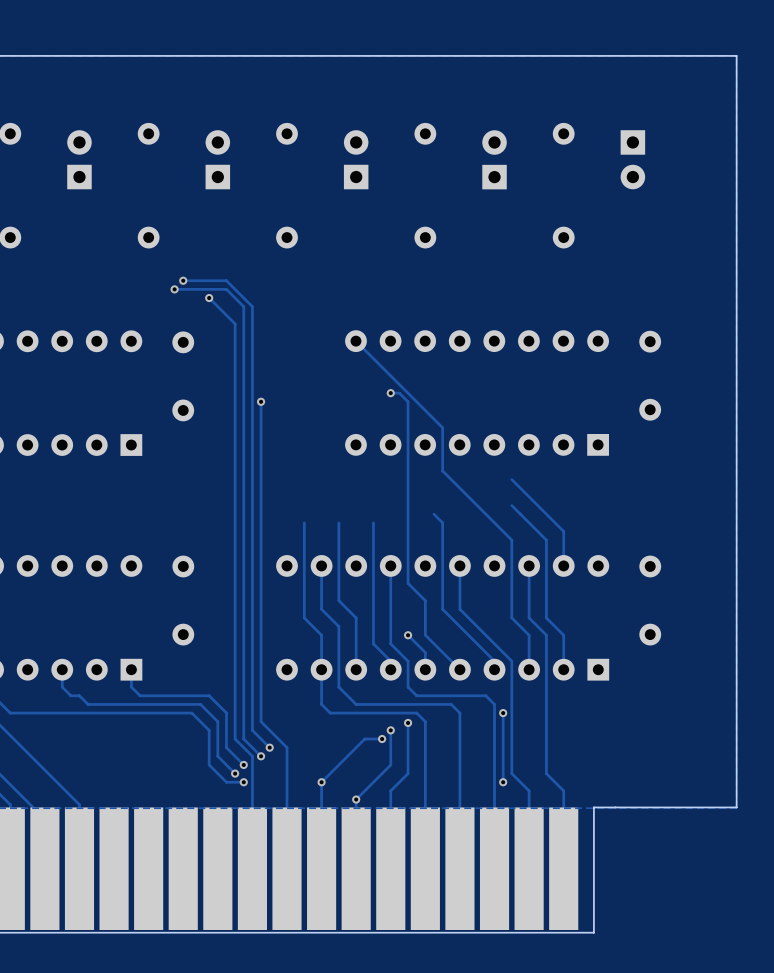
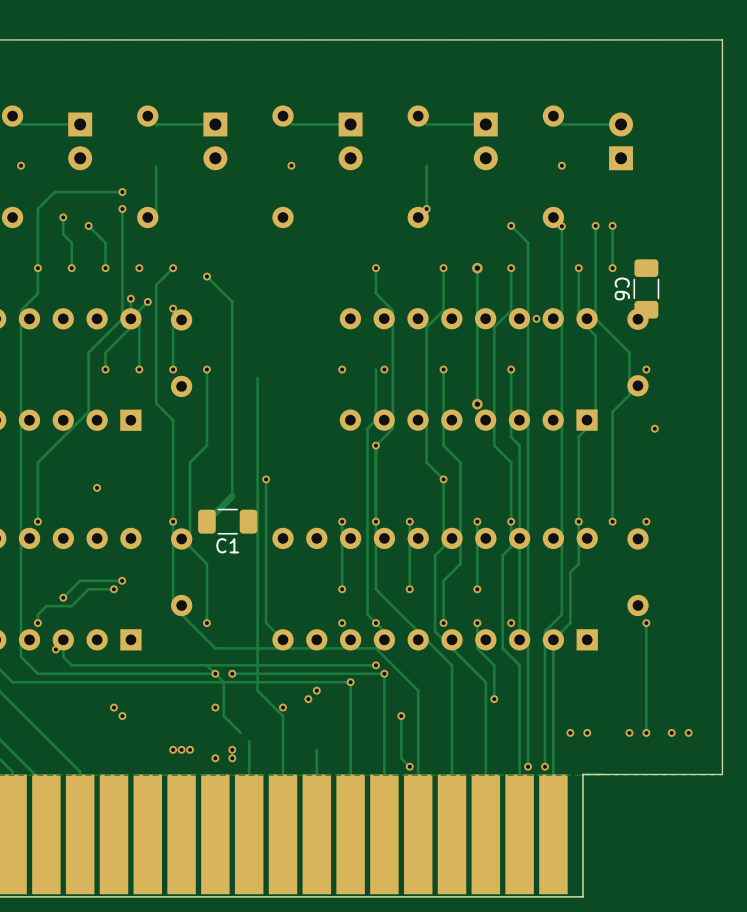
track: none -> (80, 124) (21, 124)
track: none -> (215, 124) (156, 125)
track: none -> (350, 124) (291, 124)
track: none -> (485, 124) (426, 124)
track: none -> (621, 124) (561, 124)
part rotation: 0° (79, 159) -> 180° (80, 141)
part rotation: 0° (217, 159) -> 180° (215, 141)
part rotation: 0° (356, 159) -> 180° (350, 141)
part rotation: 0° (494, 159) -> 180° (485, 141)
part rotation: 0° (632, 159) -> 180° (621, 141)
via: none -> (21, 165)
via: none -> (291, 165)
track: none -> (426, 165) (426, 208)
via: none -> (561, 165)
track: none -> (156, 166) (156, 217)
track: none -> (122, 192) (54, 192) (37, 208) (37, 293) (21, 310) (21, 656) (37, 673) (88, 673)
via: none -> (122, 192)
track: none -> (122, 208) (122, 318) (88, 352) (88, 411) (37, 462) (37, 521)
via: none -> (122, 208)
via: none -> (426, 208)
track: none -> (63, 217) (63, 234) (71, 242) (71, 268)
via: none -> (63, 217)
track: none -> (88, 225) (105, 242) (105, 268)
via: none -> (88, 225)
track: none -> (511, 225) (528, 242) (528, 766)
via: none -> (511, 225)
track: none -> (561, 226) (561, 614) (544, 631) (544, 766)
via: none -> (561, 226)
track: none -> (595, 225) (595, 318) (629, 352) (629, 394) (612, 411) (612, 521)
via: none -> (595, 225)
track: none -> (612, 225) (612, 268)
via: none -> (612, 225)
track: (183, 280) (226, 280) (252, 306) (252, 730) (269, 747) -> none
via: (183, 280) -> none
via: none -> (37, 268)
via: none -> (71, 268)
via: none -> (105, 268)
via: none -> (139, 268)
track: (174, 289) (226, 289) (243, 306) (243, 739) (261, 756) -> (173, 268) (156, 285) (156, 403) (173, 420) (173, 606) (215, 648) (375, 648) (409, 682)
track: none -> (375, 268) (375, 293) (392, 310) (392, 428) (375, 445) (375, 589) (452, 665) (452, 682)
via: none -> (375, 268)
via: none -> (443, 268)
track: none -> (477, 268) (477, 404)
via: none -> (477, 268)
track: none -> (511, 268) (511, 310) (494, 327) (494, 445) (502, 454)
via: none -> (511, 268)
via: none -> (578, 268)
via: none -> (612, 268)
C6: none -> (646, 288)
track: none -> (130, 298) (130, 327) (105, 352) (105, 369)
via: none -> (130, 298)
track: none -> (147, 301) (139, 310) (139, 369)
via: none -> (147, 301)
track: none -> (173, 308) (173, 369)
via: none -> (173, 308)
track: (355, 341) (442, 427) (442, 470) (511, 540) (511, 583) -> none
via: none -> (536, 318)
via: none -> (105, 369)
via: none -> (139, 369)
via: none -> (173, 369)
track: none -> (206, 369) (206, 445) (190, 462) (190, 547) (206, 563) (206, 623)
via: none -> (206, 369)
via: none -> (342, 369)
track: none -> (375, 369) (375, 420) (367, 428) (367, 496)
track: (390, 393) (399, 393) (408, 401) (408, 583) (425, 600) (425, 635) (459, 669) -> none
track: none -> (443, 369) (443, 445) (460, 462) (460, 563) (443, 580) (443, 623)
via: none -> (443, 369)
track: none -> (511, 369) (511, 437) (519, 445) (519, 538)
via: none -> (511, 369)
via: none -> (646, 369)
via: (261, 401) -> none
via: none -> (477, 404)
via: none -> (654, 428)
via: none -> (375, 445)
track: (520, 488) (563, 531) (563, 565) -> (511, 462) (511, 547) (502, 555)
track: none -> (266, 479) (266, 623) (282, 639)
via: none -> (266, 479)
via: none -> (443, 479)
track: (511, 505) (546, 540) (546, 617) (563, 635) (563, 669) -> none
via: none -> (97, 487)
track: (434, 514) (442, 522) (442, 583) -> (443, 268) (443, 310) (426, 327) (426, 462) (443, 479) (443, 547) (435, 555)
track: (235, 522) (235, 739) (252, 756) (252, 773) -> (232, 496) (206, 521)
track: (304, 522) (304, 617) (321, 635) (321, 704) (330, 713) -> none
track: (338, 522) (338, 600) (356, 617) (356, 669) -> none
via: none -> (37, 521)
via: none -> (173, 521)
C1: none -> (227, 521)
track: none -> (342, 521) (342, 589)
via: none -> (342, 521)
via: none -> (375, 521)
track: none -> (409, 521) (409, 589)
via: none -> (409, 521)
track: none -> (477, 521) (477, 589)
via: none -> (477, 521)
via: none -> (511, 521)
via: none -> (578, 521)
via: none -> (612, 521)
via: none -> (646, 521)
track: (321, 565) (321, 609) (338, 626) (338, 687) (356, 704) -> (232, 673) (350, 673)
track: (390, 565) (390, 643) (408, 661) (408, 687) (416, 695) (485, 695) (494, 704) (494, 713) -> none
track: (459, 565) (459, 609) (511, 661) -> (502, 589) (502, 631)
track: none -> (122, 580) (80, 580) (63, 597)
via: none -> (122, 580)
track: (442, 609) (494, 661) (494, 669) -> (435, 580) (435, 631) (485, 682)
track: none -> (113, 589) (88, 589) (71, 606) (46, 606) (37, 614) (37, 623)
via: none -> (113, 589)
via: none -> (342, 589)
via: none -> (409, 589)
via: none -> (477, 589)
track: (511, 617) (529, 635) -> (519, 589) (519, 606)
track: (529, 617) (546, 635) (546, 773) (563, 790) -> (578, 268) (578, 318) (595, 335) (595, 419) (578, 436) (578, 563) (570, 572) (570, 623) (553, 639) (553, 758)
via: none -> (63, 597)
track: (408, 635) (425, 652) (425, 669) -> none
via: (408, 635) -> none
via: none -> (37, 623)
via: none -> (206, 623)
via: none -> (342, 623)
via: none -> (375, 623)
via: none -> (443, 623)
track: none -> (477, 623) (477, 648) (494, 665) (494, 682)
via: none -> (477, 623)
via: none -> (511, 623)
track: none -> (646, 623) (646, 732)
via: none -> (646, 623)
track: (131, 669) (131, 687) (140, 695) -> (401, 741) (401, 758) (409, 766)
track: (511, 678) (511, 773) (529, 790) -> (502, 648) (519, 665) (519, 758)
via: none -> (55, 649)
track: (79, 695) (88, 704) -> (80, 665) (139, 665)
track: none -> (375, 665) (206, 665)
via: none -> (375, 665)
track: (200, 704) (217, 721) (217, 756) (235, 773) -> (198, 673) (215, 673)
via: none -> (215, 673)
via: none -> (232, 673)
track: (390, 704) (451, 704) (459, 713) -> (384, 673) (384, 699)
via: none -> (384, 673)
track: (191, 713) (209, 730) (209, 764) (226, 782) (243, 782) -> (190, 682) (325, 682)
via: none -> (350, 682)
track: (416, 713) (356, 713) -> none
via position: (503, 713) -> (494, 699)
via: none -> (316, 690)
track: (408, 722) (408, 747) -> none
via: (408, 722) -> none
via: none -> (308, 699)
via: (390, 730) -> none
track: (503, 730) (503, 782) -> none
via: none -> (113, 707)
via: none -> (215, 707)
via: none -> (282, 707)
track: (382, 739) (364, 739) (321, 782) -> none
via: (382, 739) -> none
via: none -> (122, 716)
via: (269, 747) -> none
via: none -> (401, 716)
via: (261, 756) -> none
via: (243, 764) -> none
track: (390, 764) (356, 799) -> (350, 682) (350, 766)
via: none -> (570, 732)
via: none -> (587, 732)
via: none -> (629, 732)
via: none -> (646, 732)
via: none -> (671, 732)
via: none -> (688, 732)
via: (235, 773) -> none
track: (408, 773) (390, 790) -> (384, 732) (384, 758)
via: none -> (173, 749)
via: none -> (181, 749)
via: none -> (190, 749)
via: none -> (232, 749)
via: (243, 782) -> none
via: (321, 782) -> none
via: (503, 782) -> none
via: none -> (215, 758)
via: none -> (232, 758)
via: (356, 799) -> none
via: none -> (409, 766)
via: none -> (528, 766)
via: none -> (544, 766)

